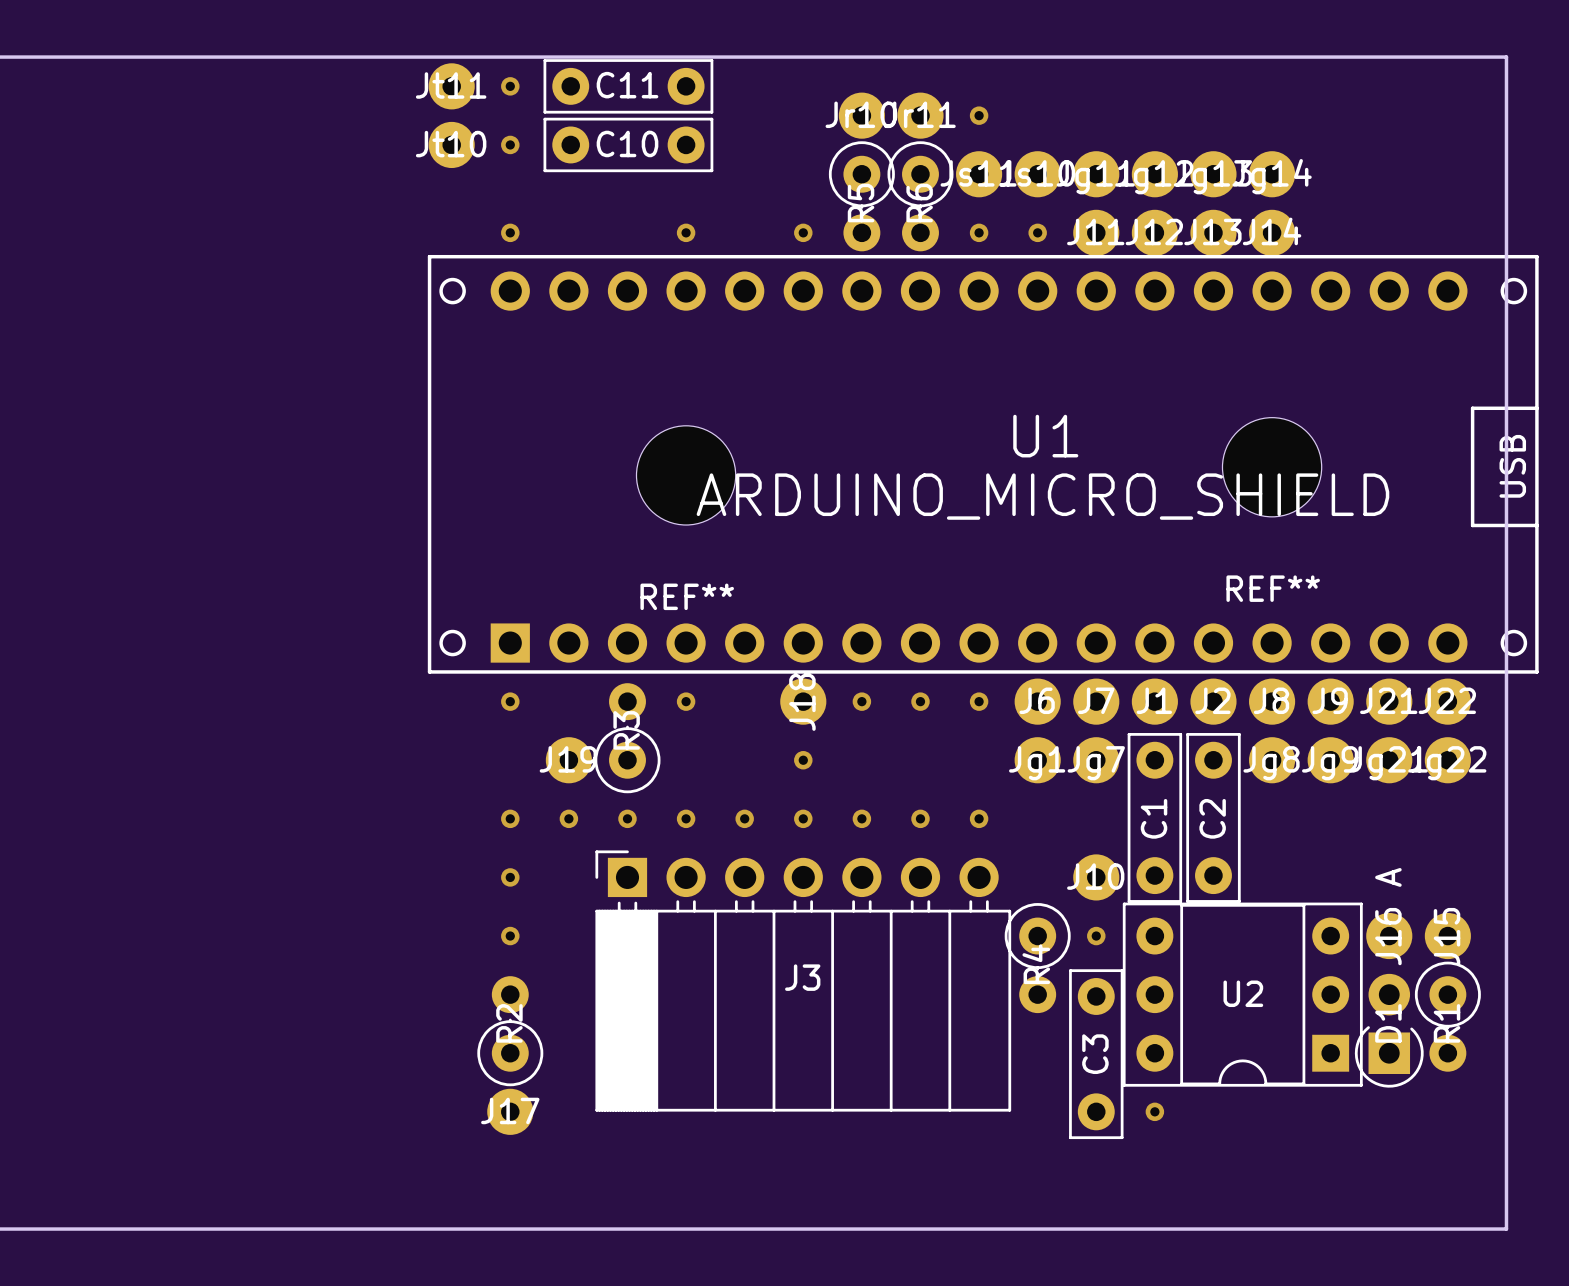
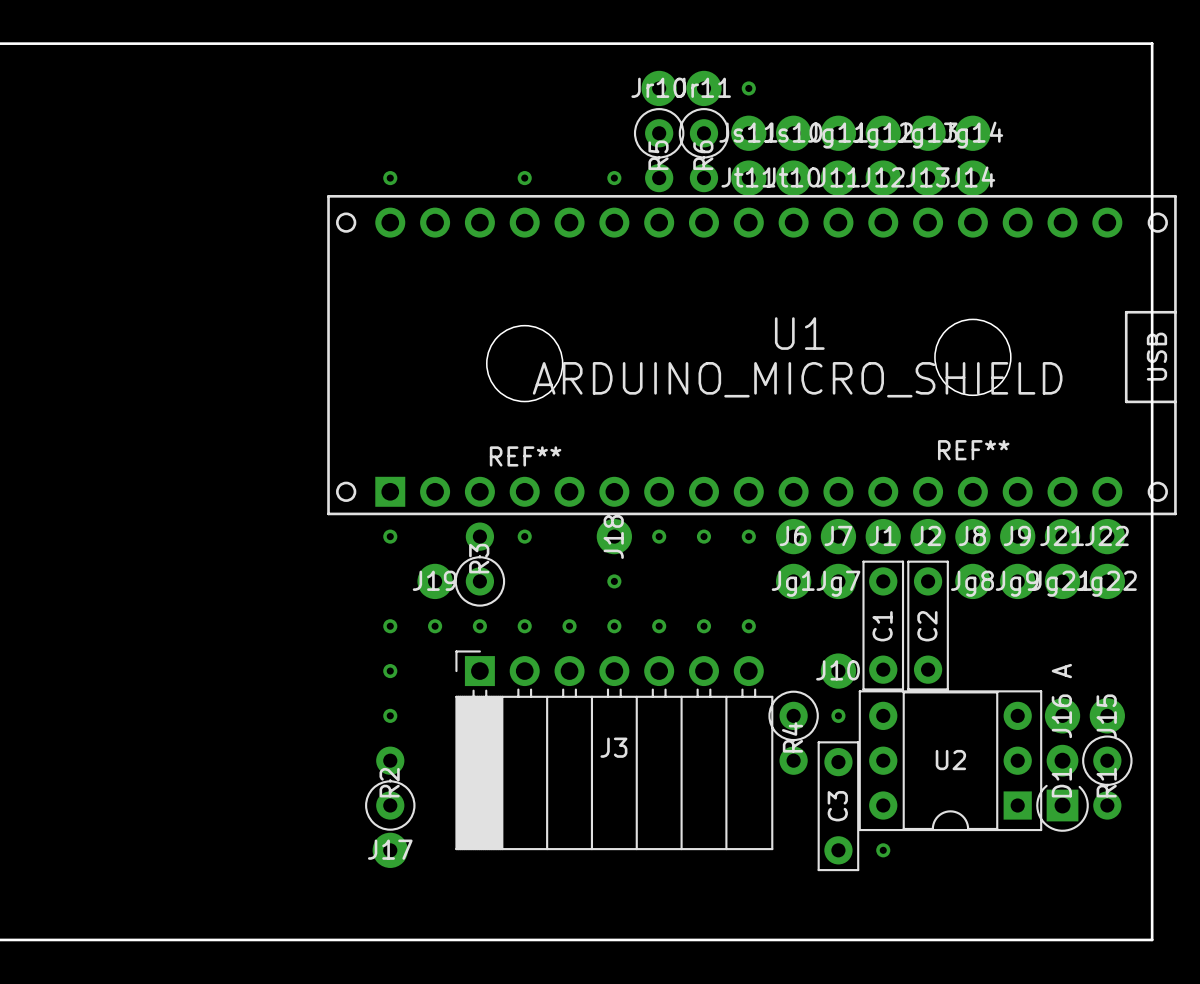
Jt11 position: (451, 86) -> (748, 178)
via: (510, 86) -> none
C11: (628, 86) -> none
Jt10 position: (451, 144) -> (793, 178)
via: (510, 144) -> none
C10: (628, 144) -> none
via: (979, 232) -> none
via: (1037, 232) -> none

